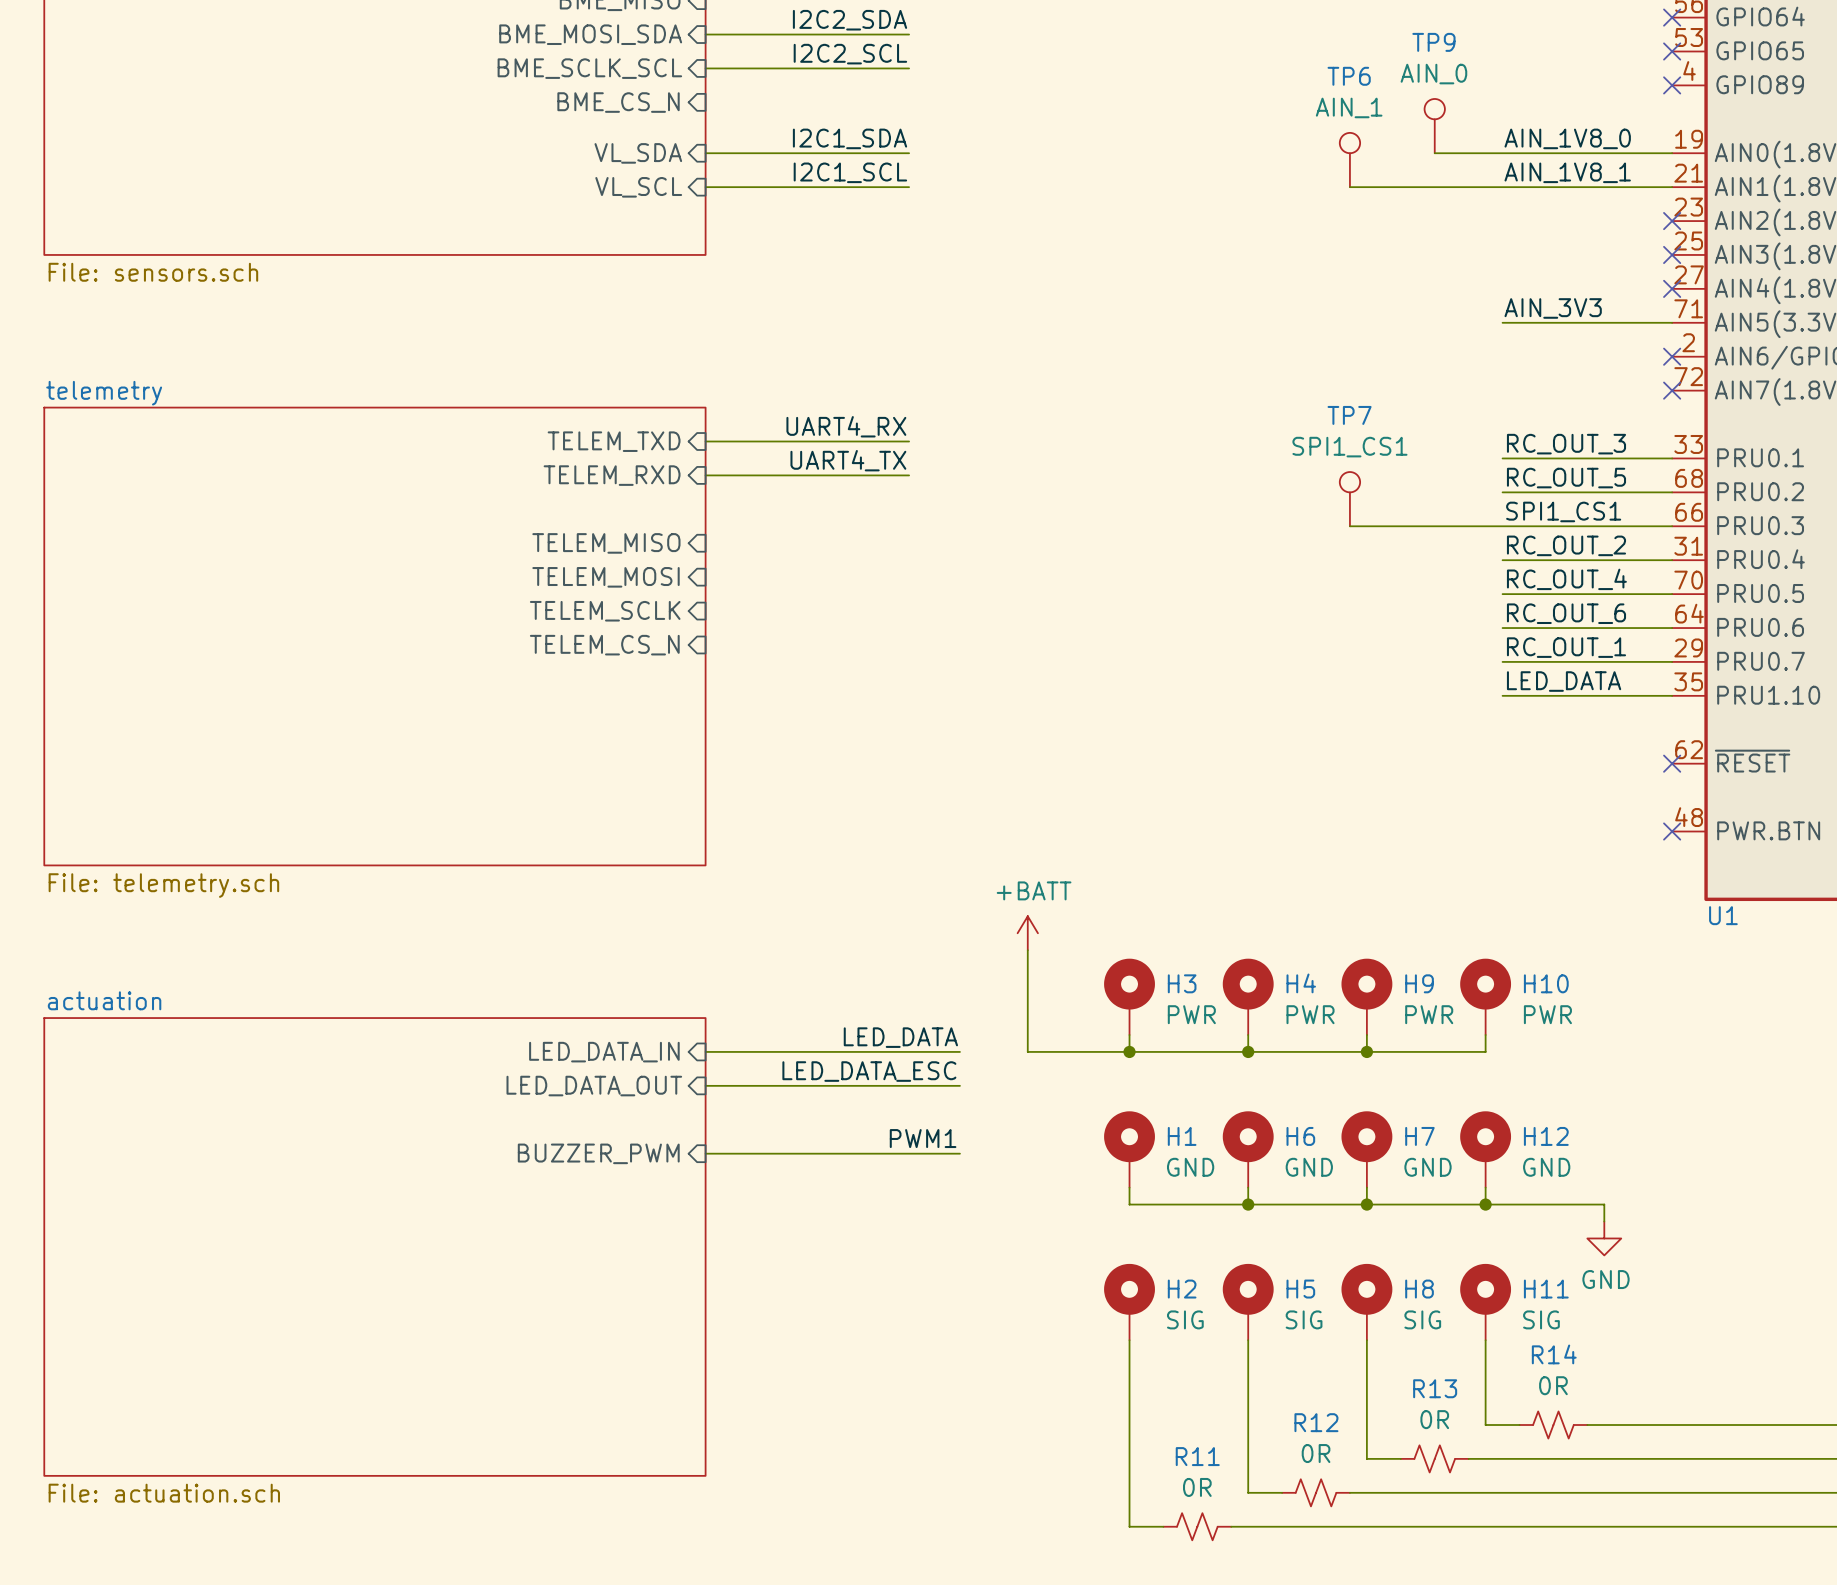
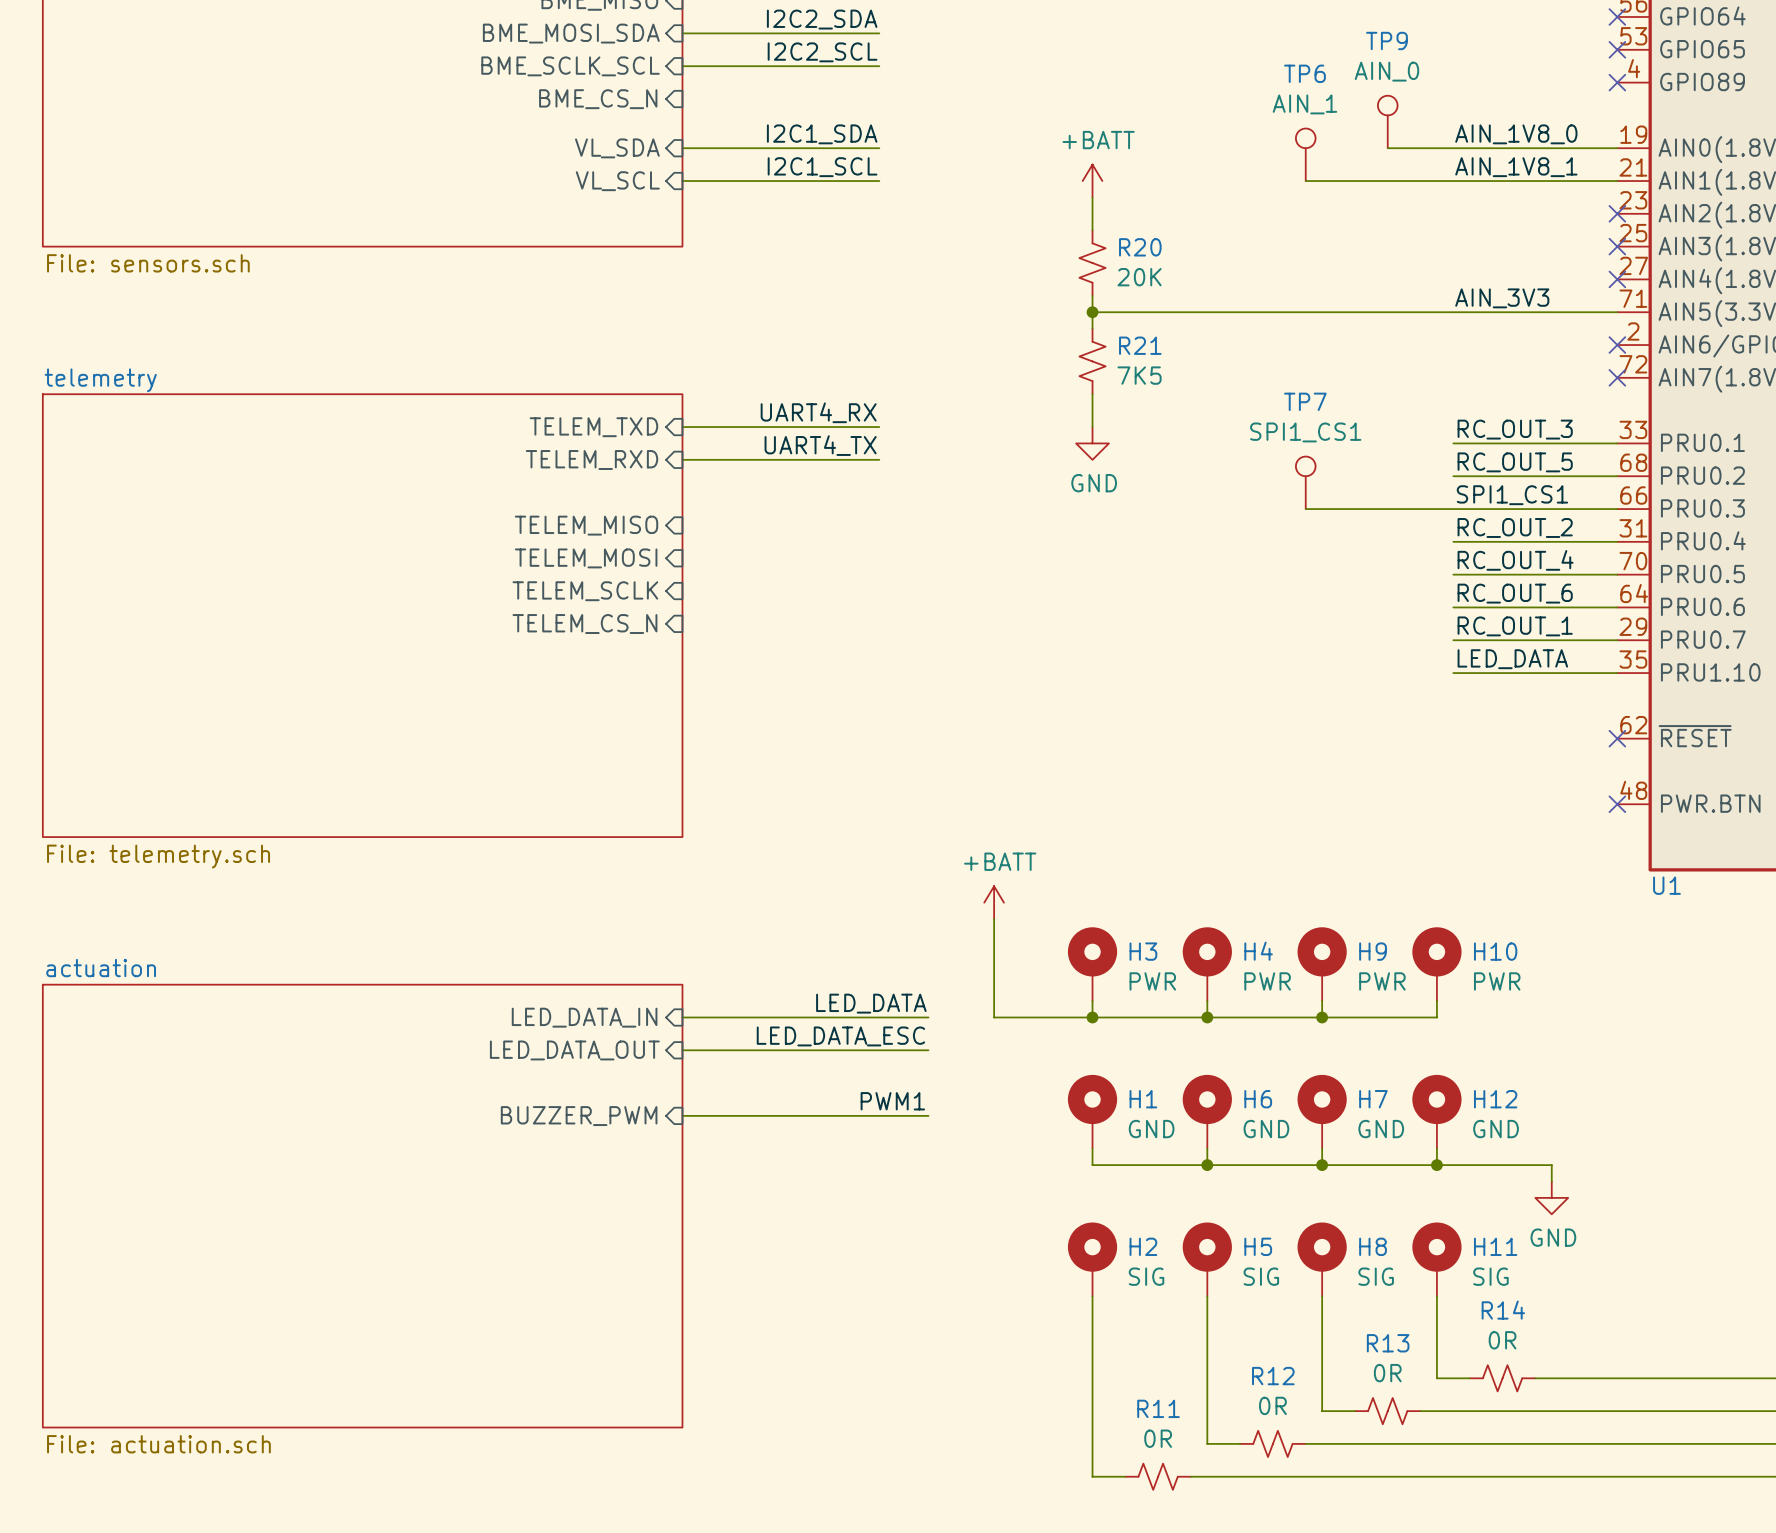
power symbol: none -> +BATT (1092, 181)
wire: none -> (1092, 197) (1092, 230)
R20: none -> 20K (1092, 263)
wire: none -> (1092, 295) (1092, 328)
wire: none -> (1092, 312) (1453, 312)
junction: none -> (1092, 312)
R21: none -> 7K5 (1092, 361)
wire: none -> (1092, 394) (1092, 427)
power symbol: none -> GND (1092, 443)

